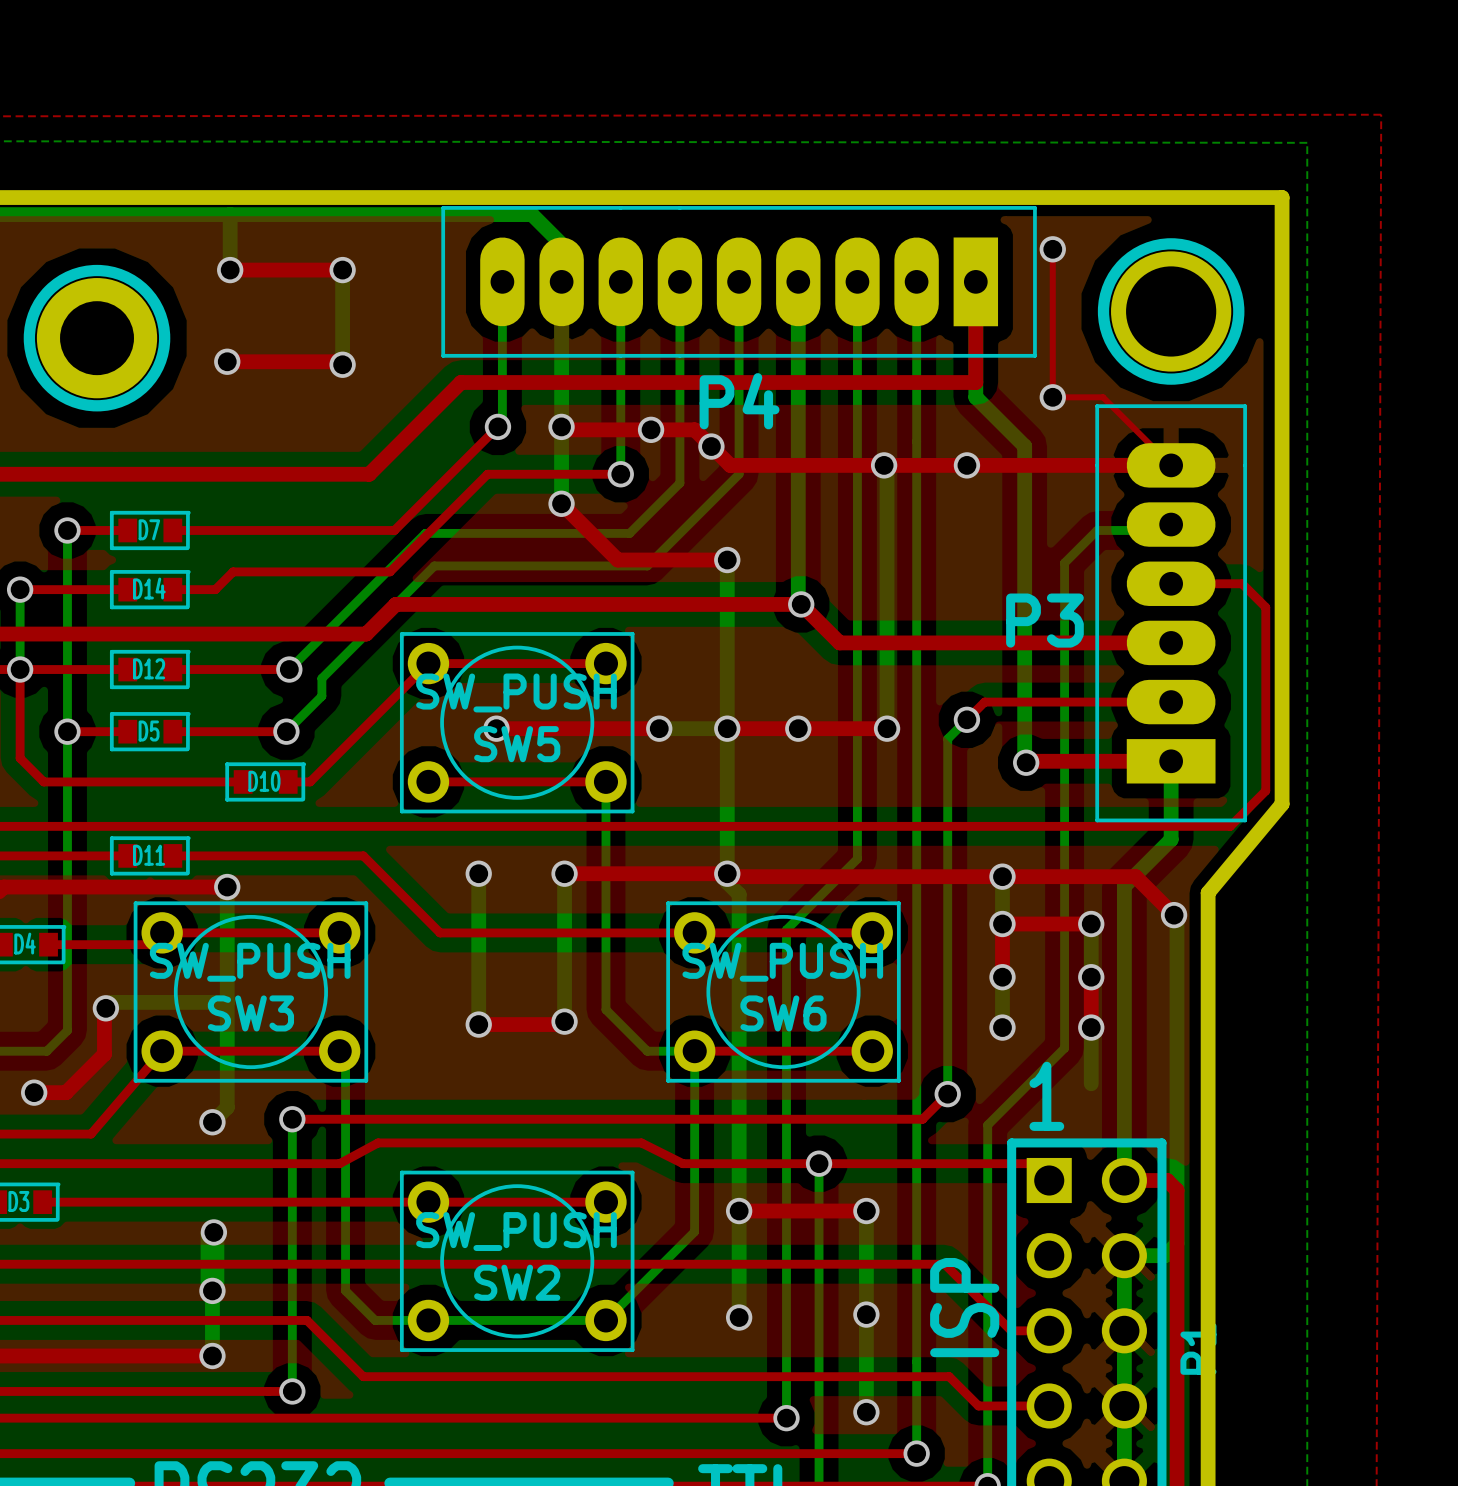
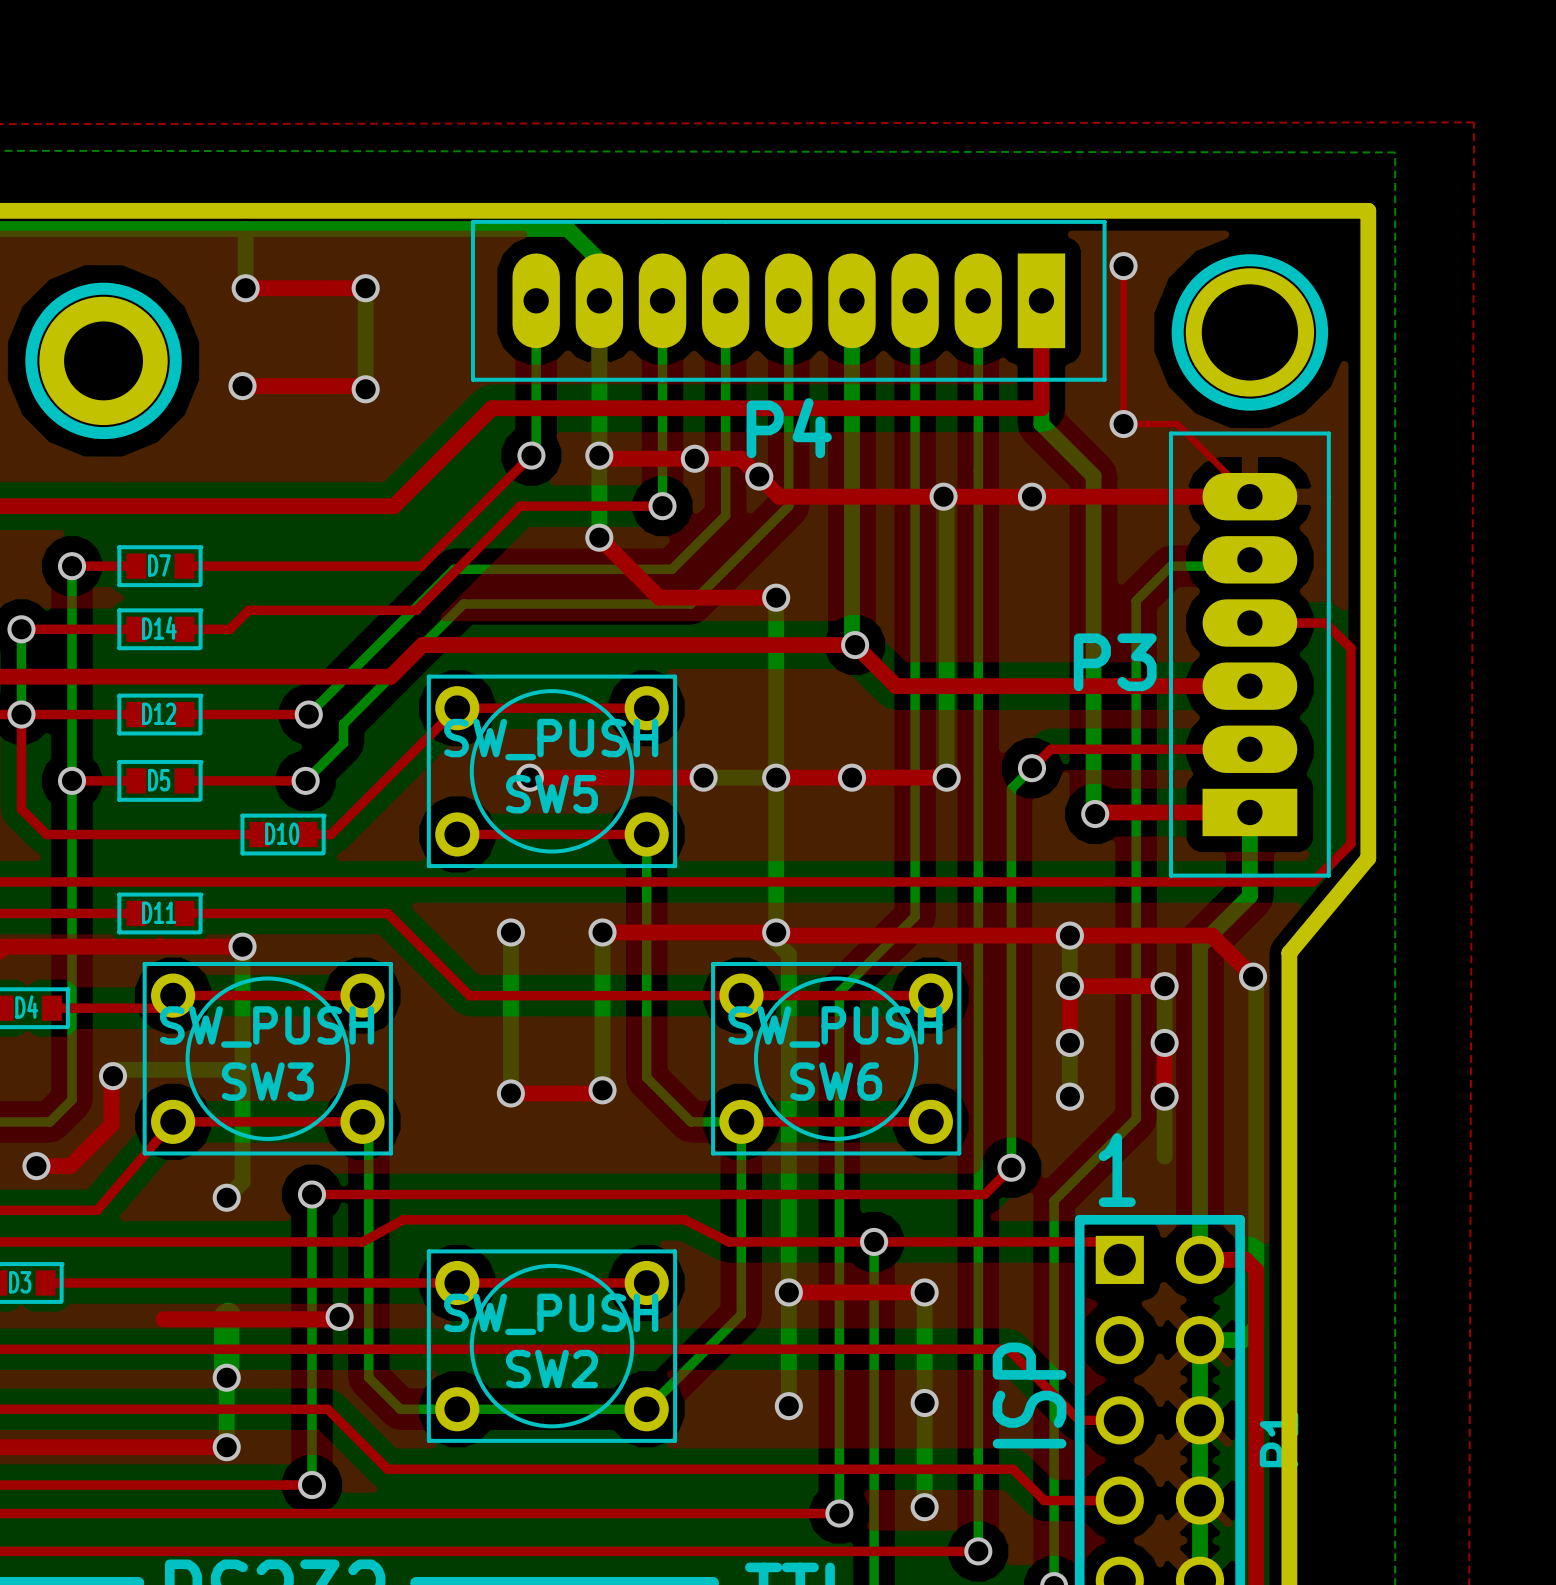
via position: (213, 1232) -> (339, 1316)
top track: none -> (339, 1316) (337, 1319) (163, 1319)

